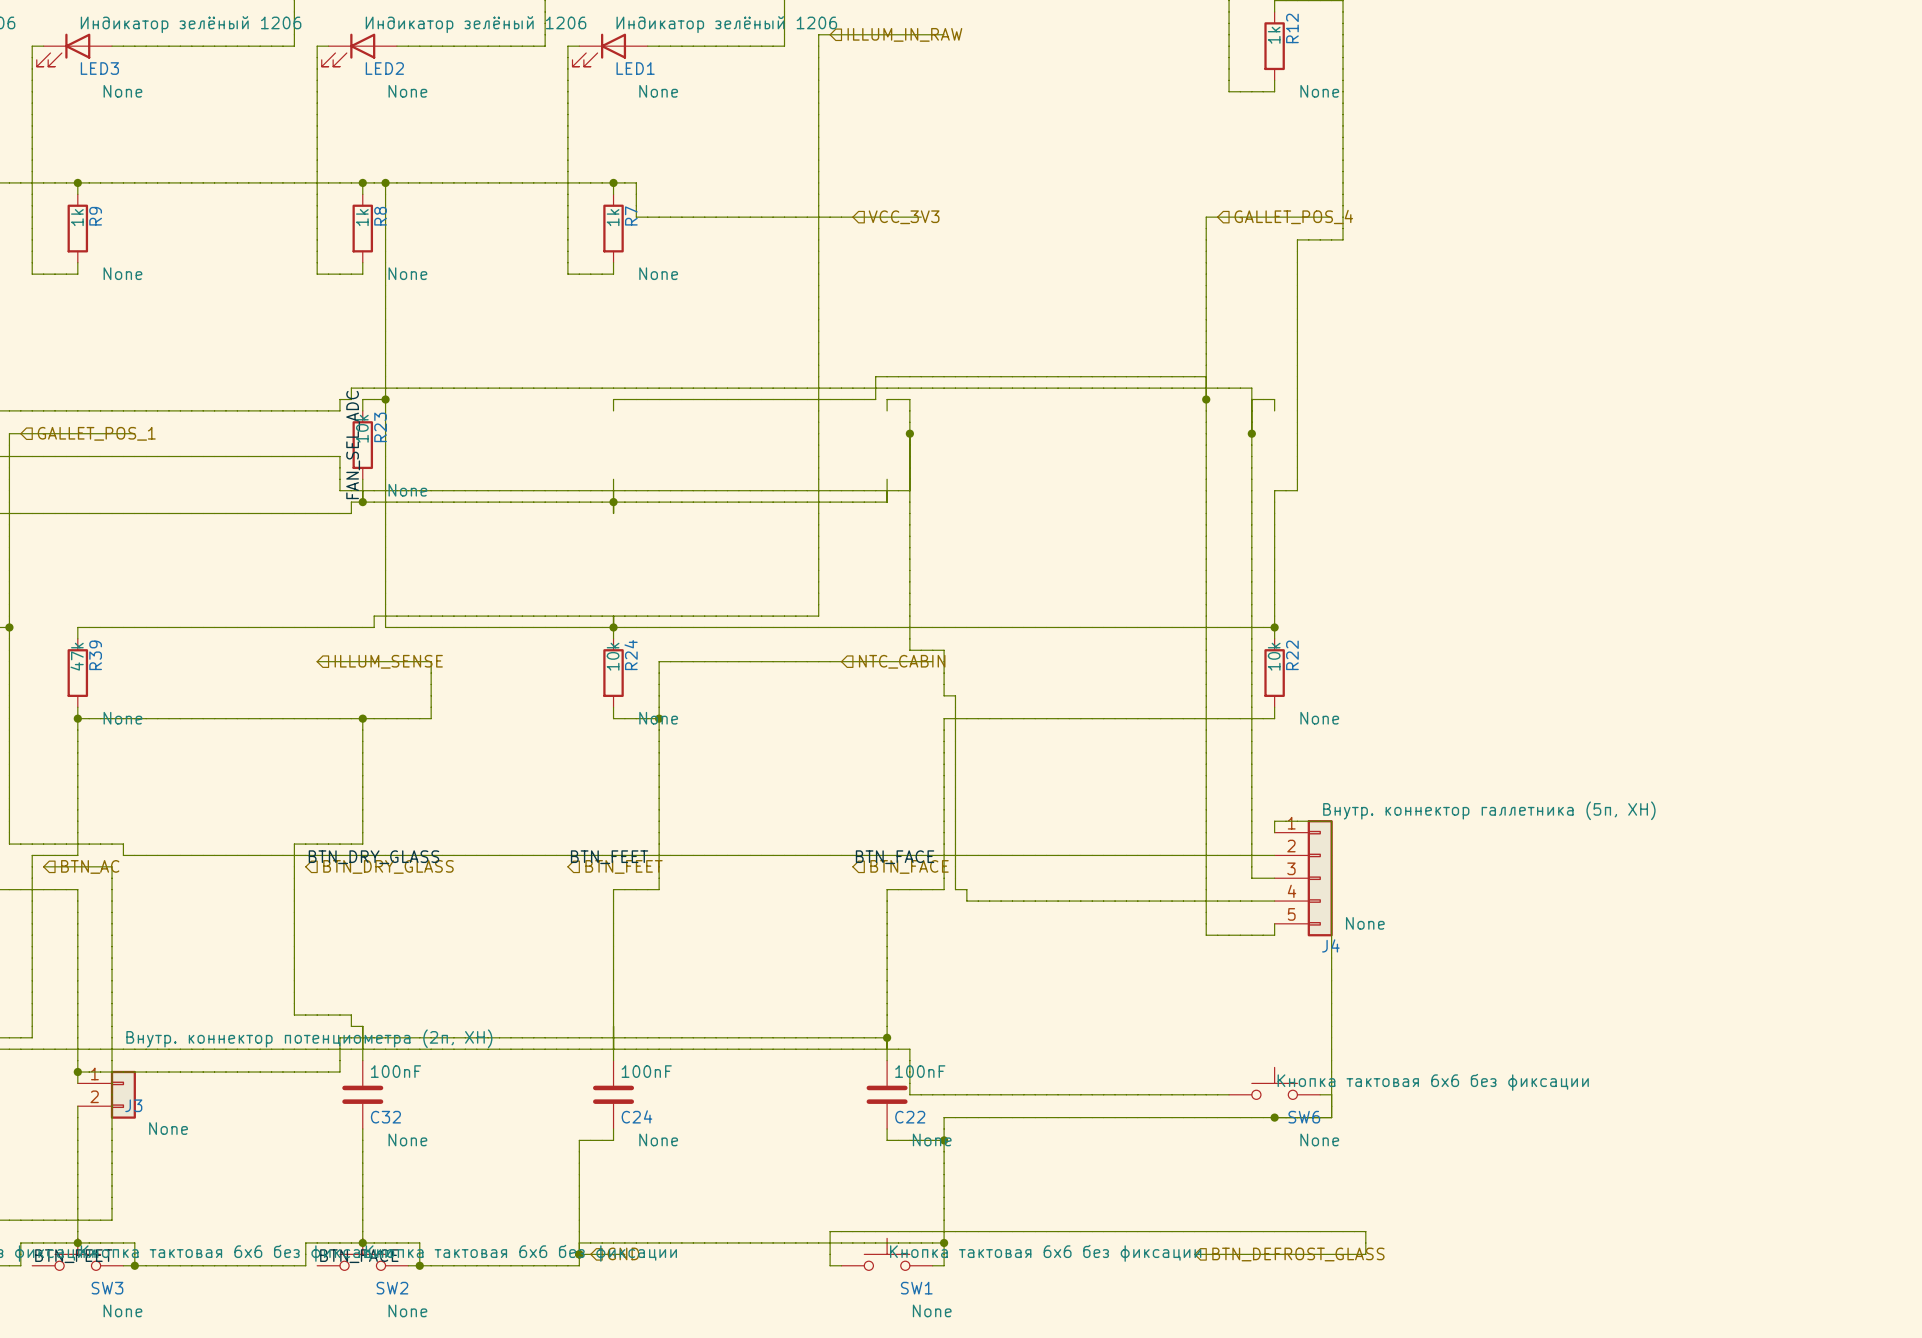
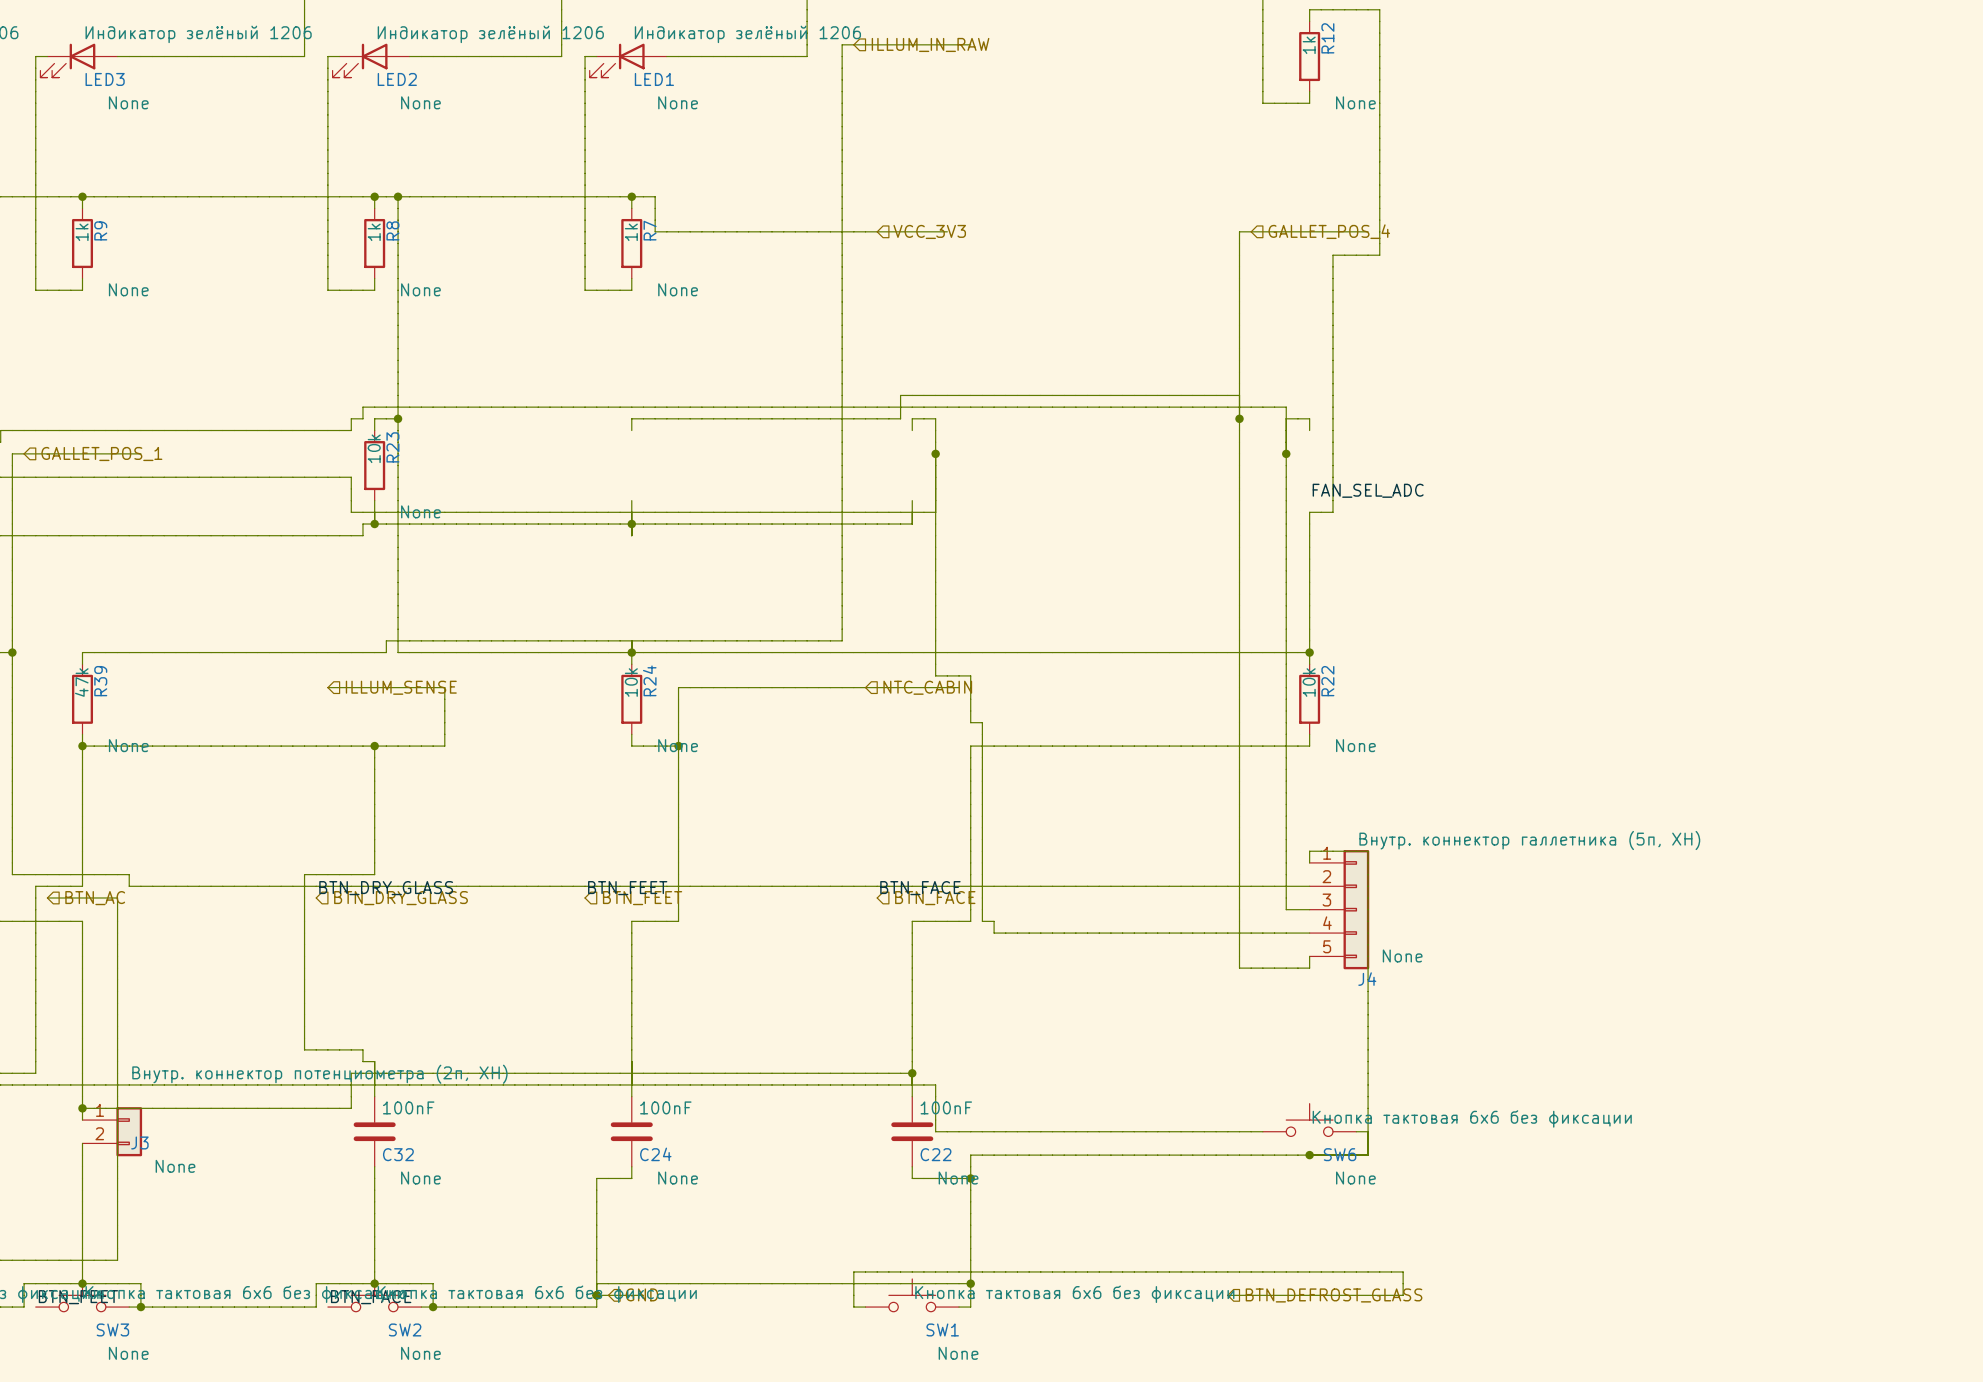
label: FAN_SEL_ADC (353, 445) -> none
label: none -> FAN_SEL_ADC (1368, 490)

